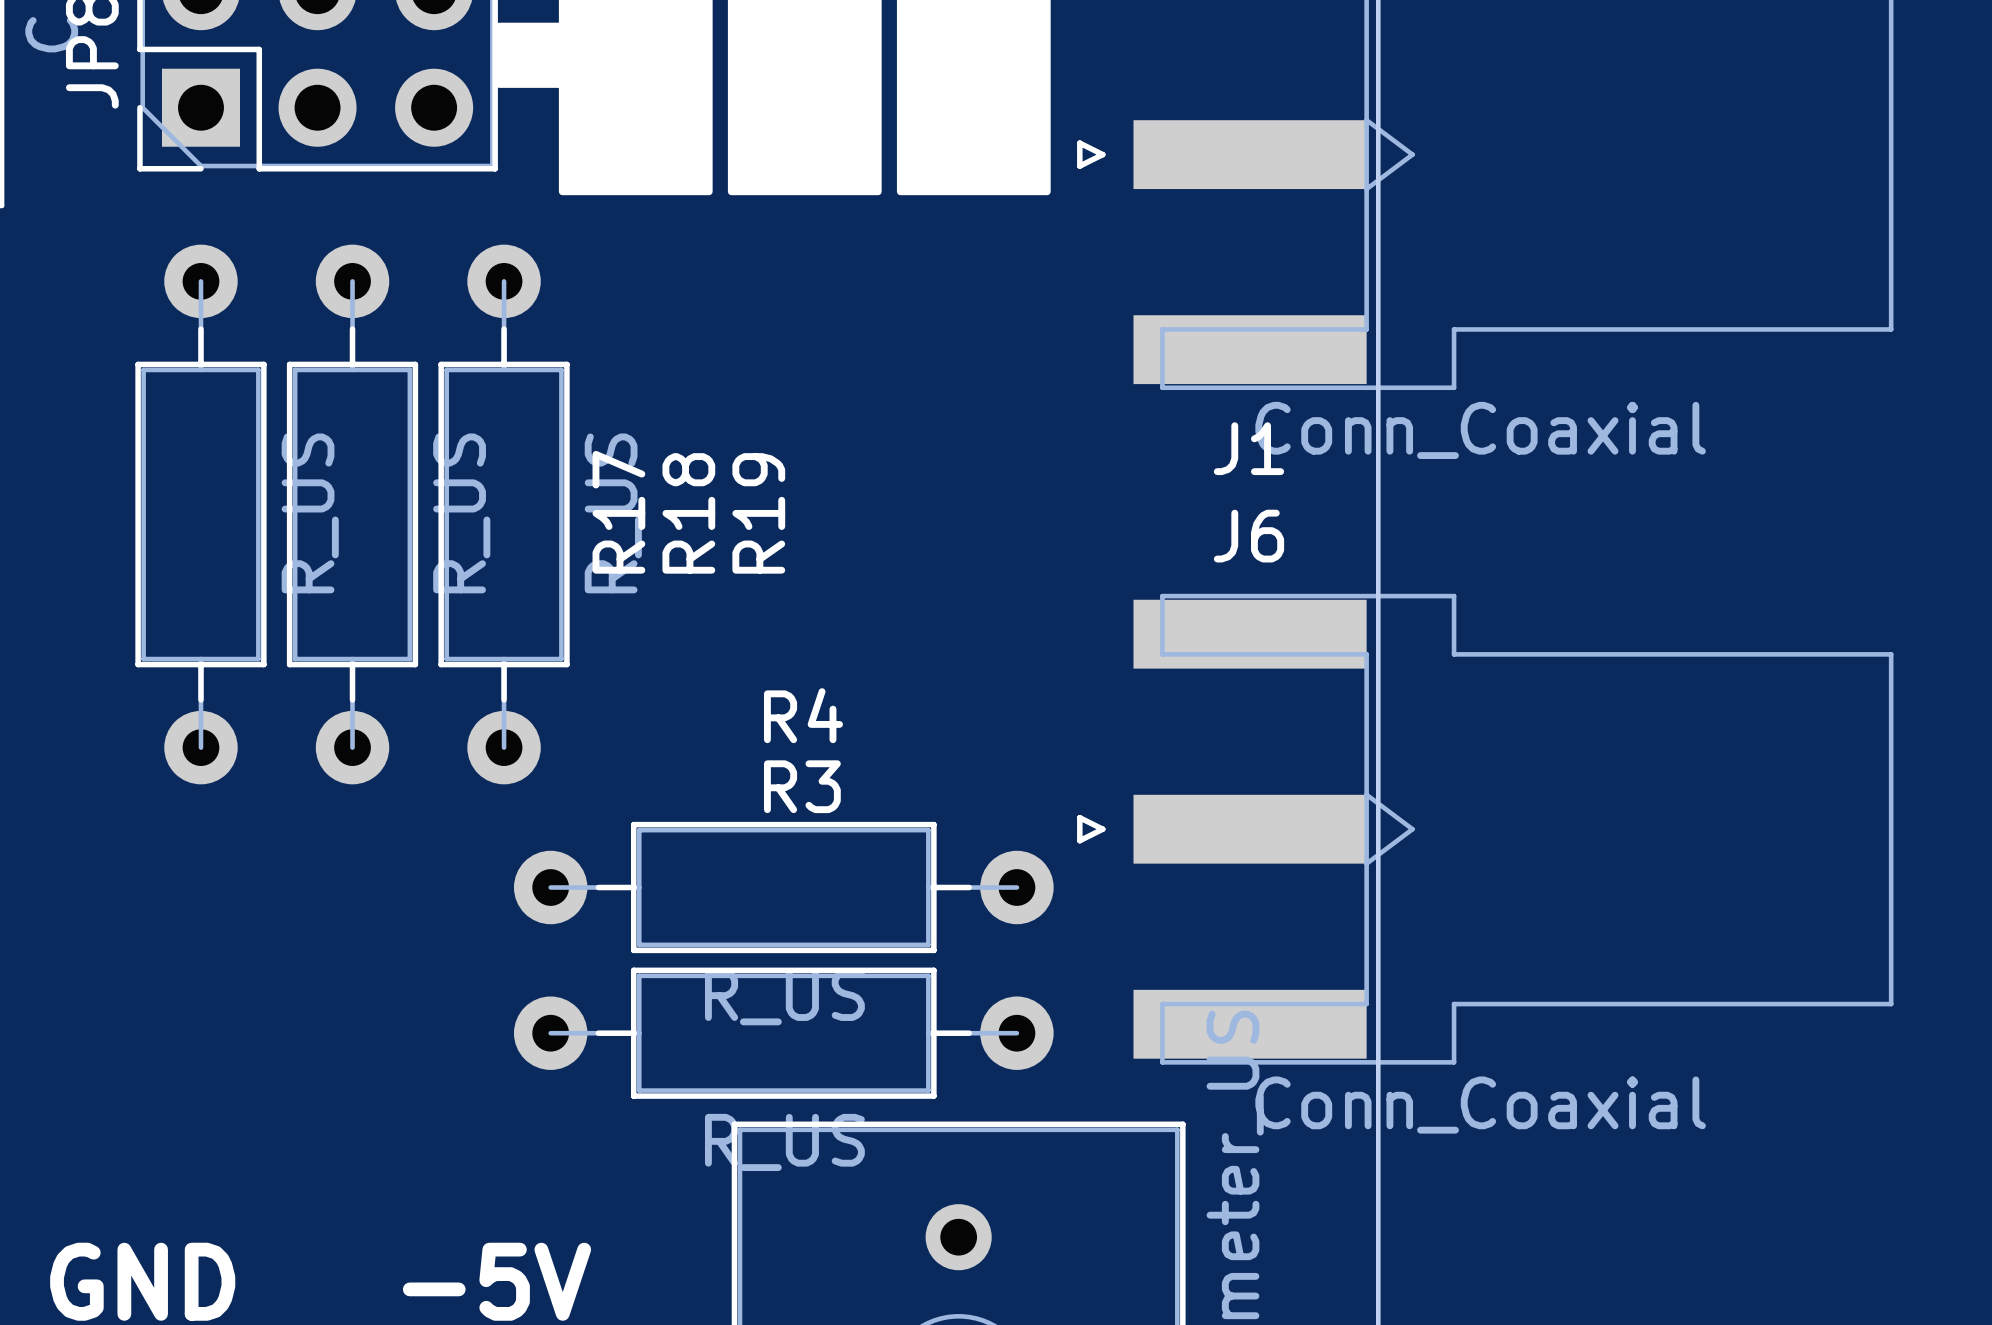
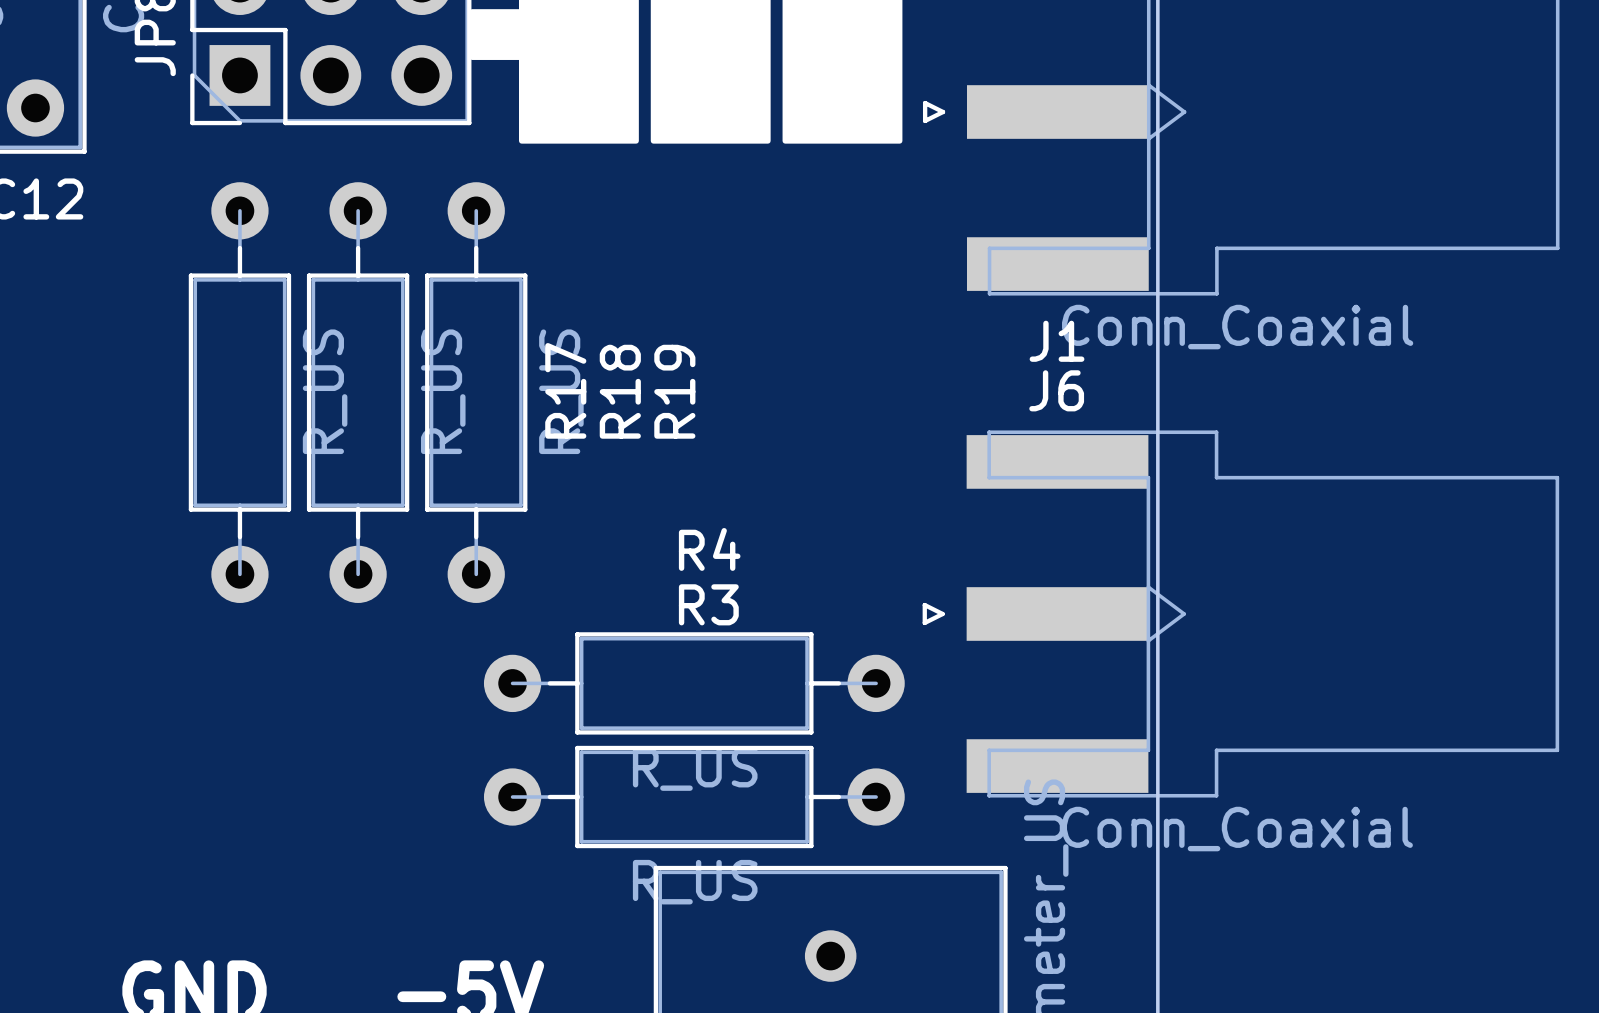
J6 name position: J6 (1248, 536) -> J6 (1056, 390)
J6 position: (1485, 829) -> (1240, 613)

